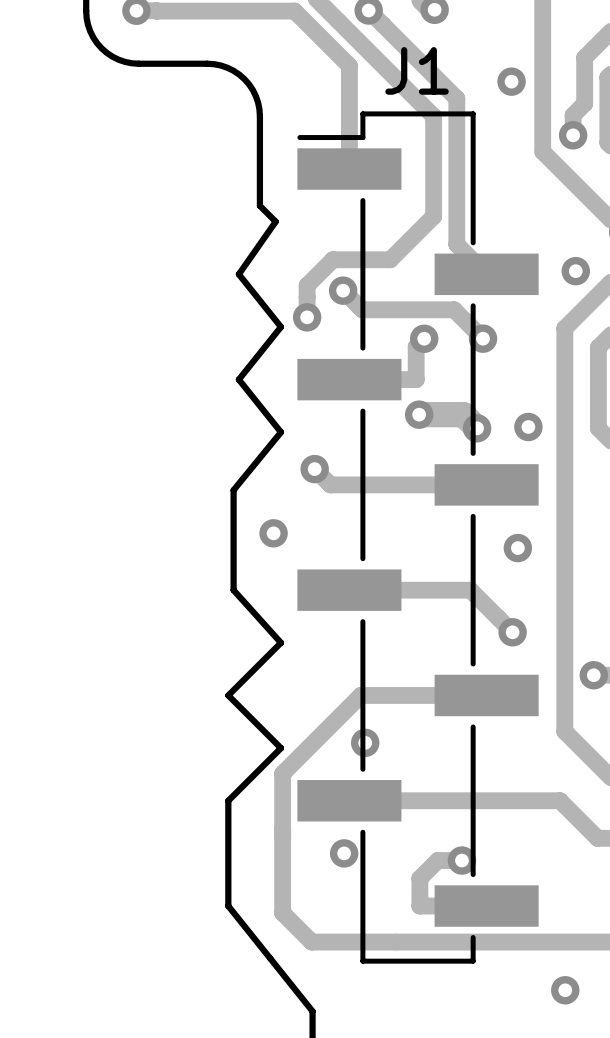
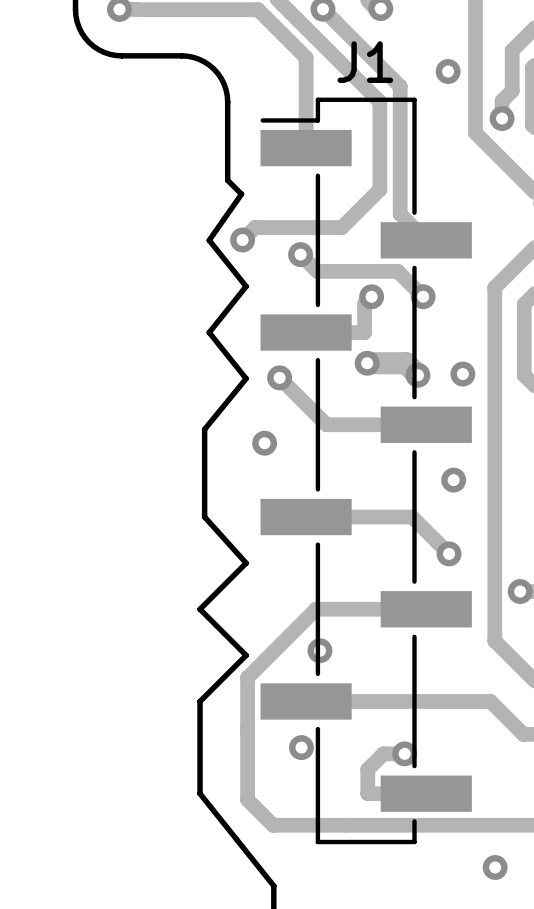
track: (332, 259) (307, 285) (307, 317) -> (291, 227) (255, 227) (242, 240)
via: (575, 271) -> none
via position: (307, 317) -> (242, 240)
via: none -> (279, 377)
track: (314, 469) (330, 484) (372, 484) -> (279, 377) (326, 424)
via: (314, 469) -> none
via: none -> (264, 443)
via: (273, 533) -> none

